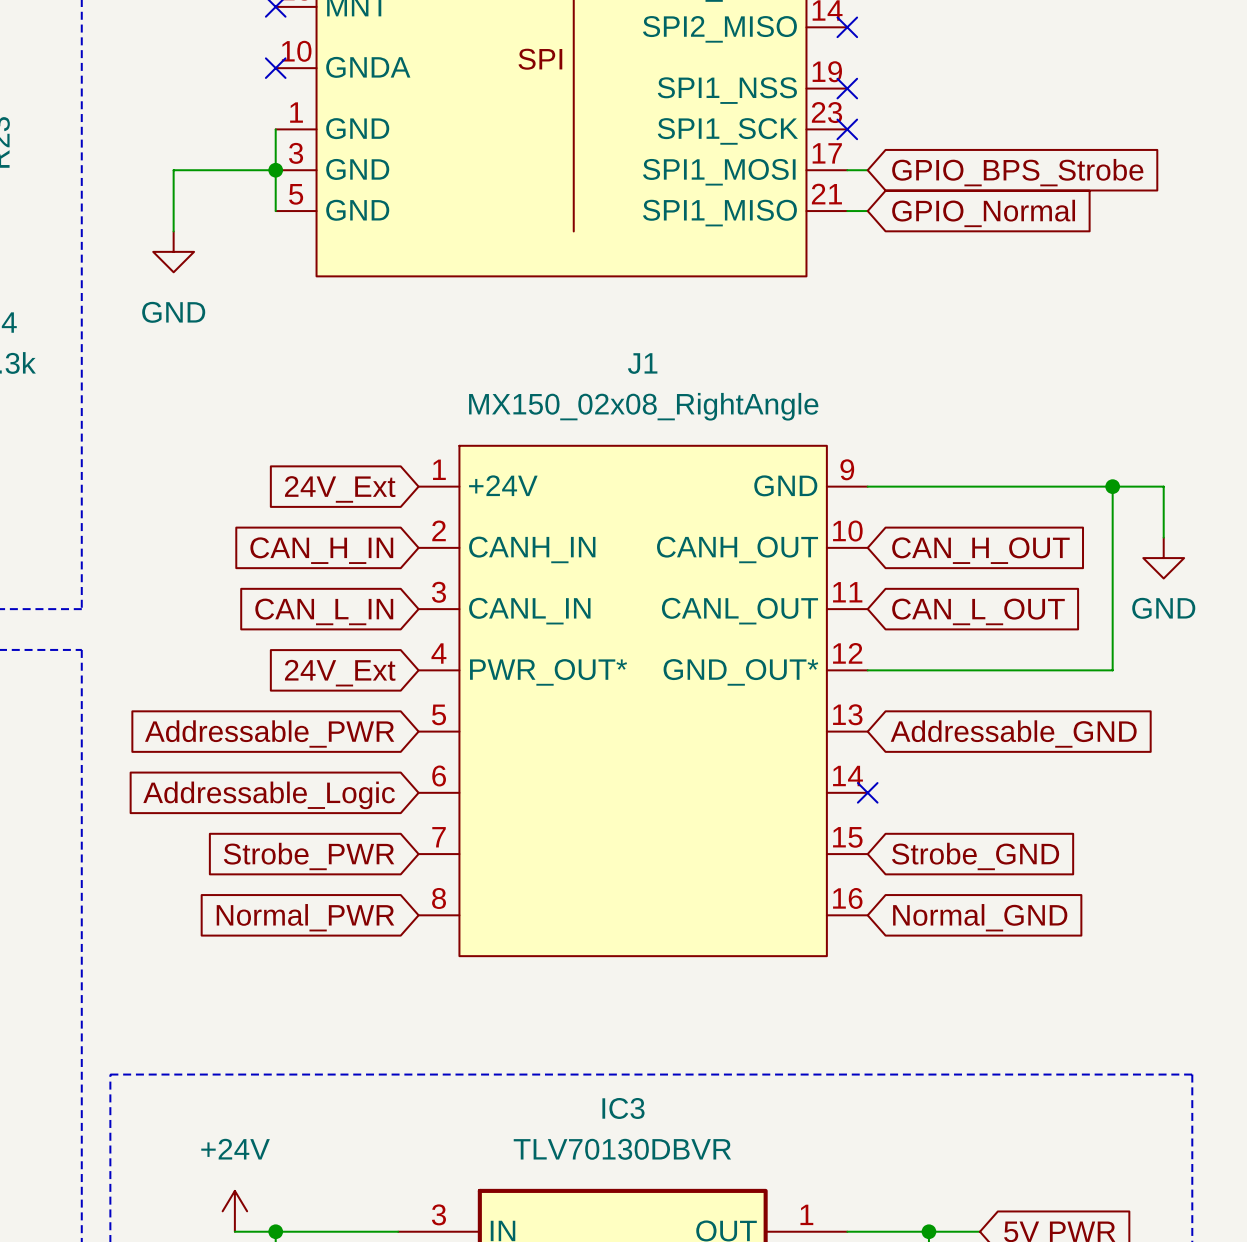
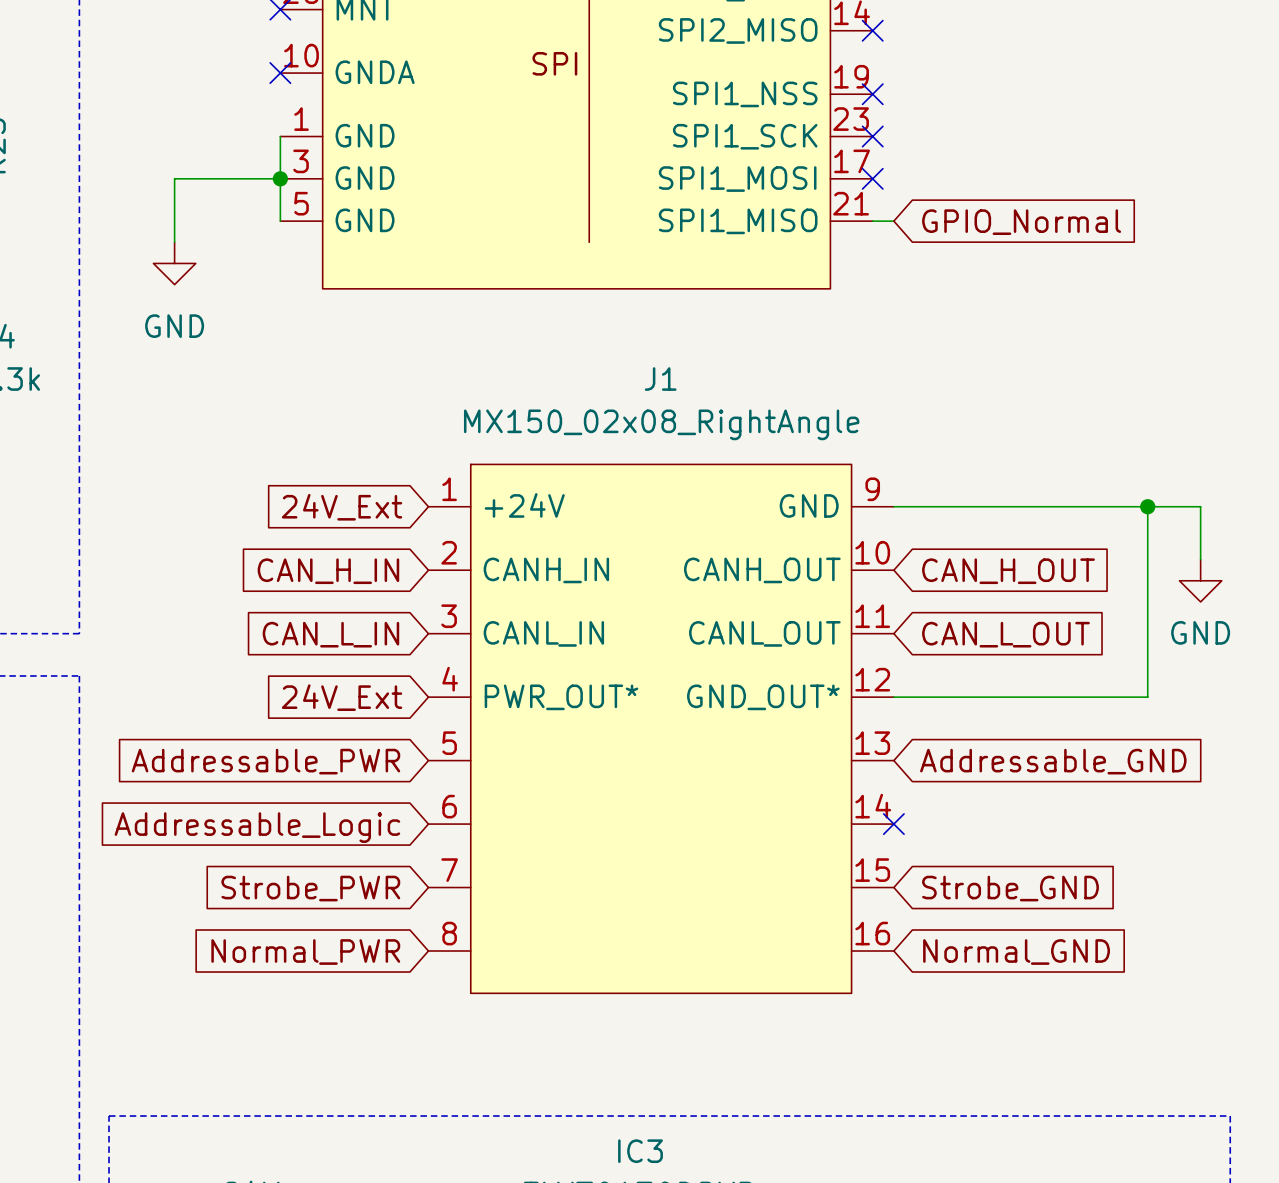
wire: (847, 170) (867, 170) -> none
no-connect mark: none -> (872, 178)
global label: GPIO_BPS_Strobe (1017, 172) -> none

